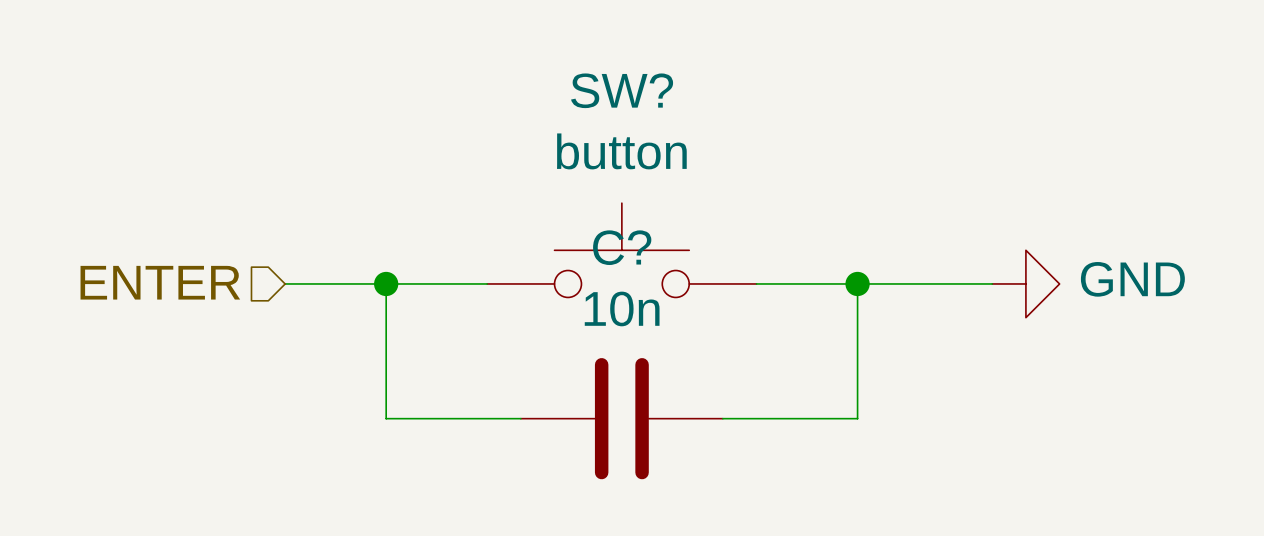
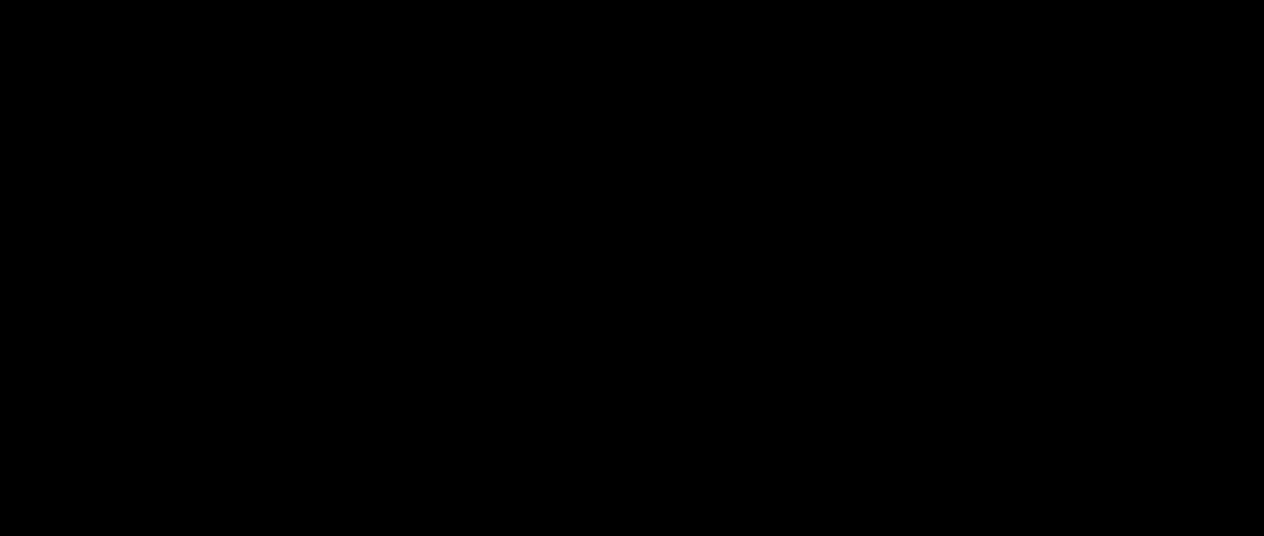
SW?: button (621, 250) -> none
hierarchical label: ENTER (160, 282) -> none
wire: (285, 283) (487, 283) -> none
wire: (386, 283) (386, 418) (520, 418) -> none
junction: (386, 283) -> none
wire: (756, 283) (992, 283) -> none
wire: (857, 283) (857, 418) (722, 418) -> none
junction: (857, 283) -> none
power symbol: GND (1025, 283) -> none
C?: 10n (621, 418) -> none

